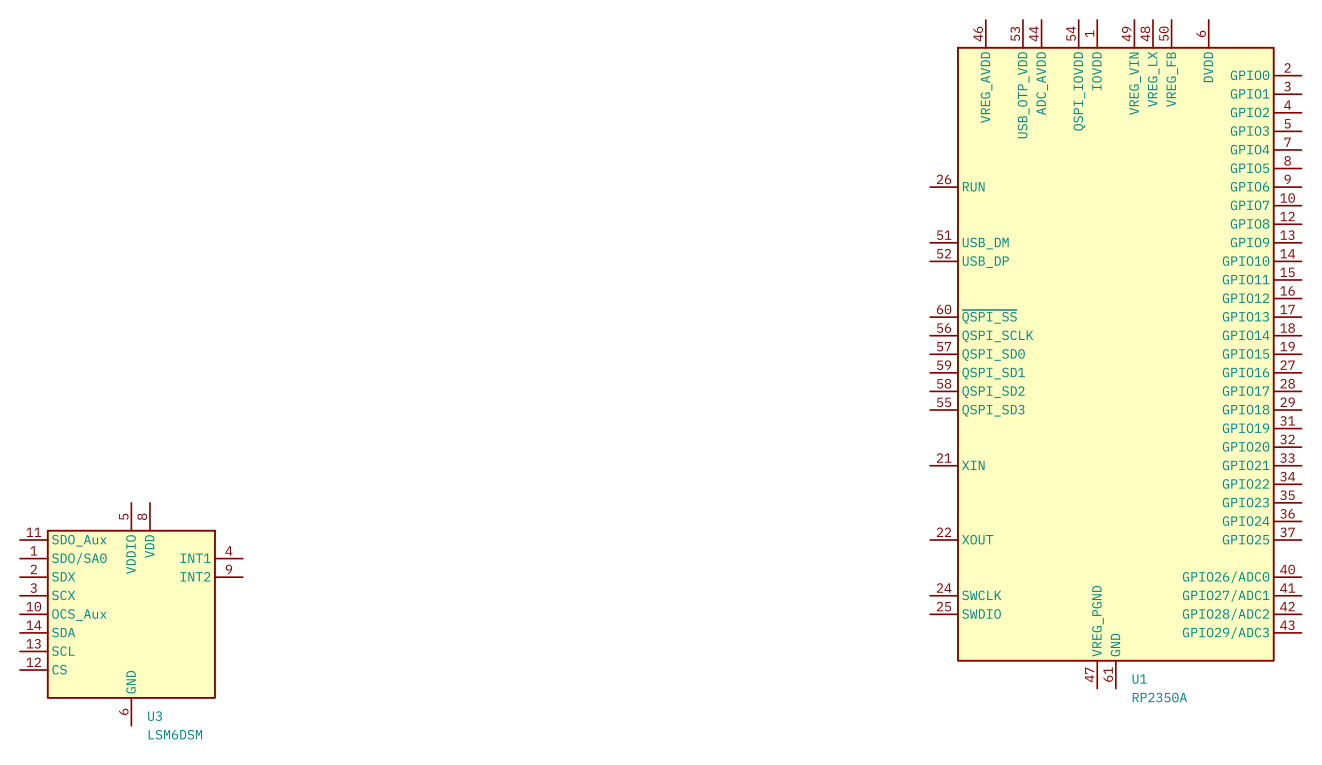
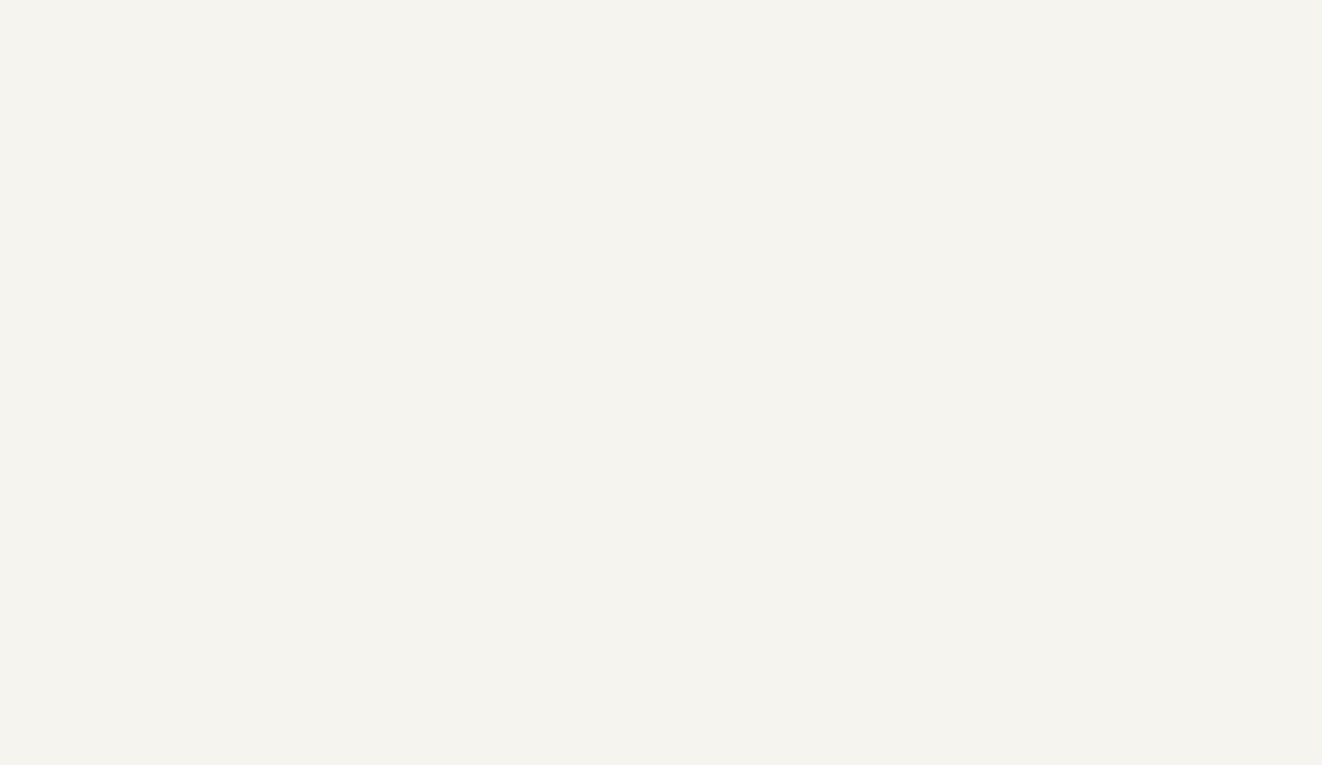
U1: RP2350A (1115, 354) -> none
U3: LSM6DSM (131, 614) -> none

